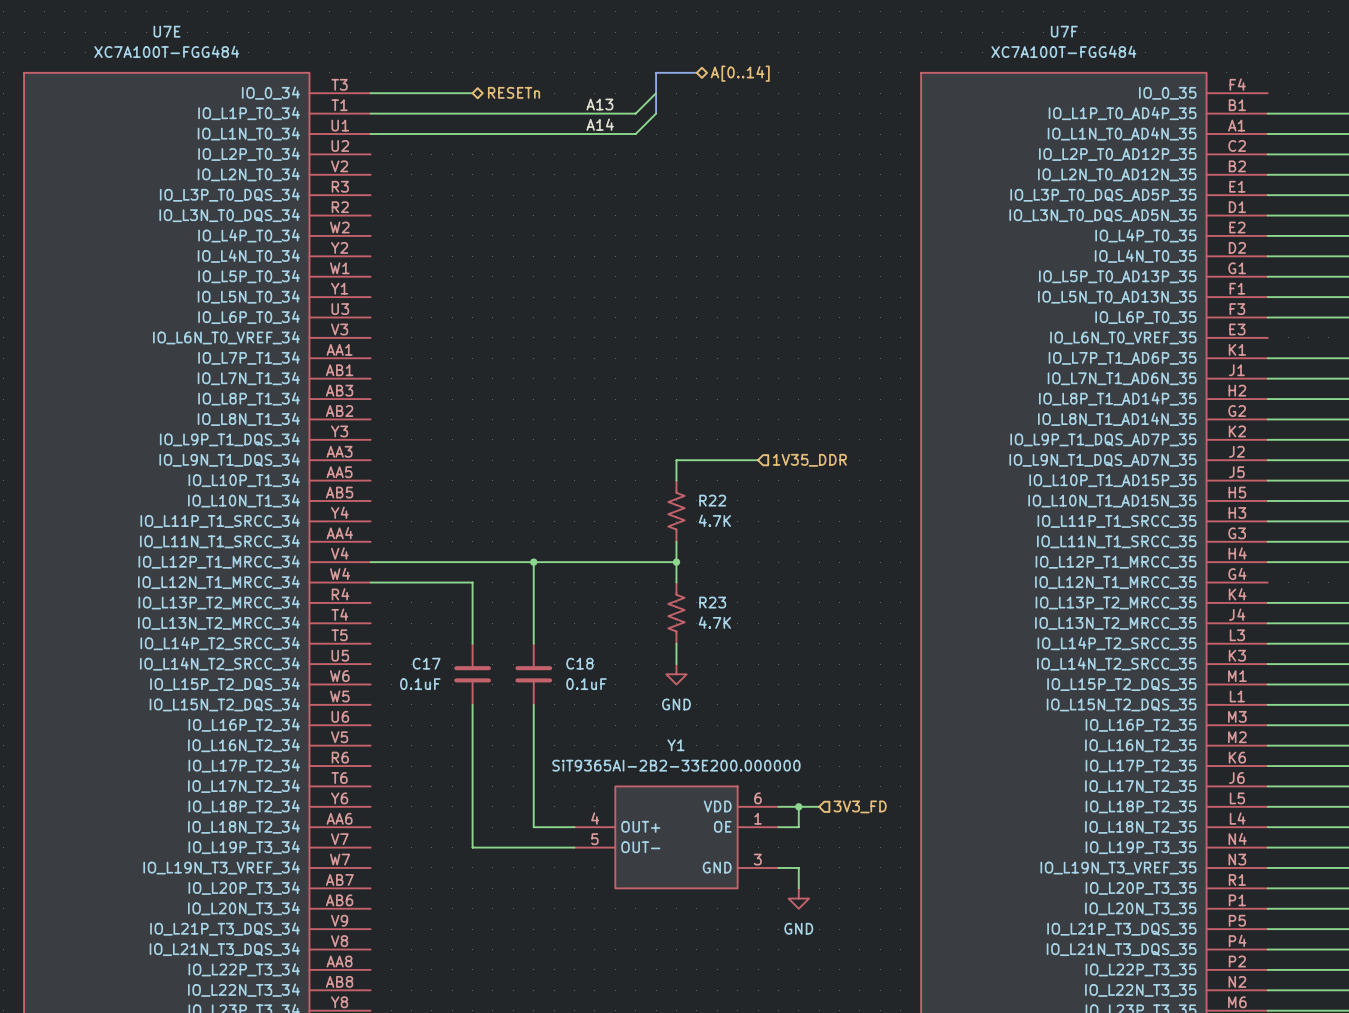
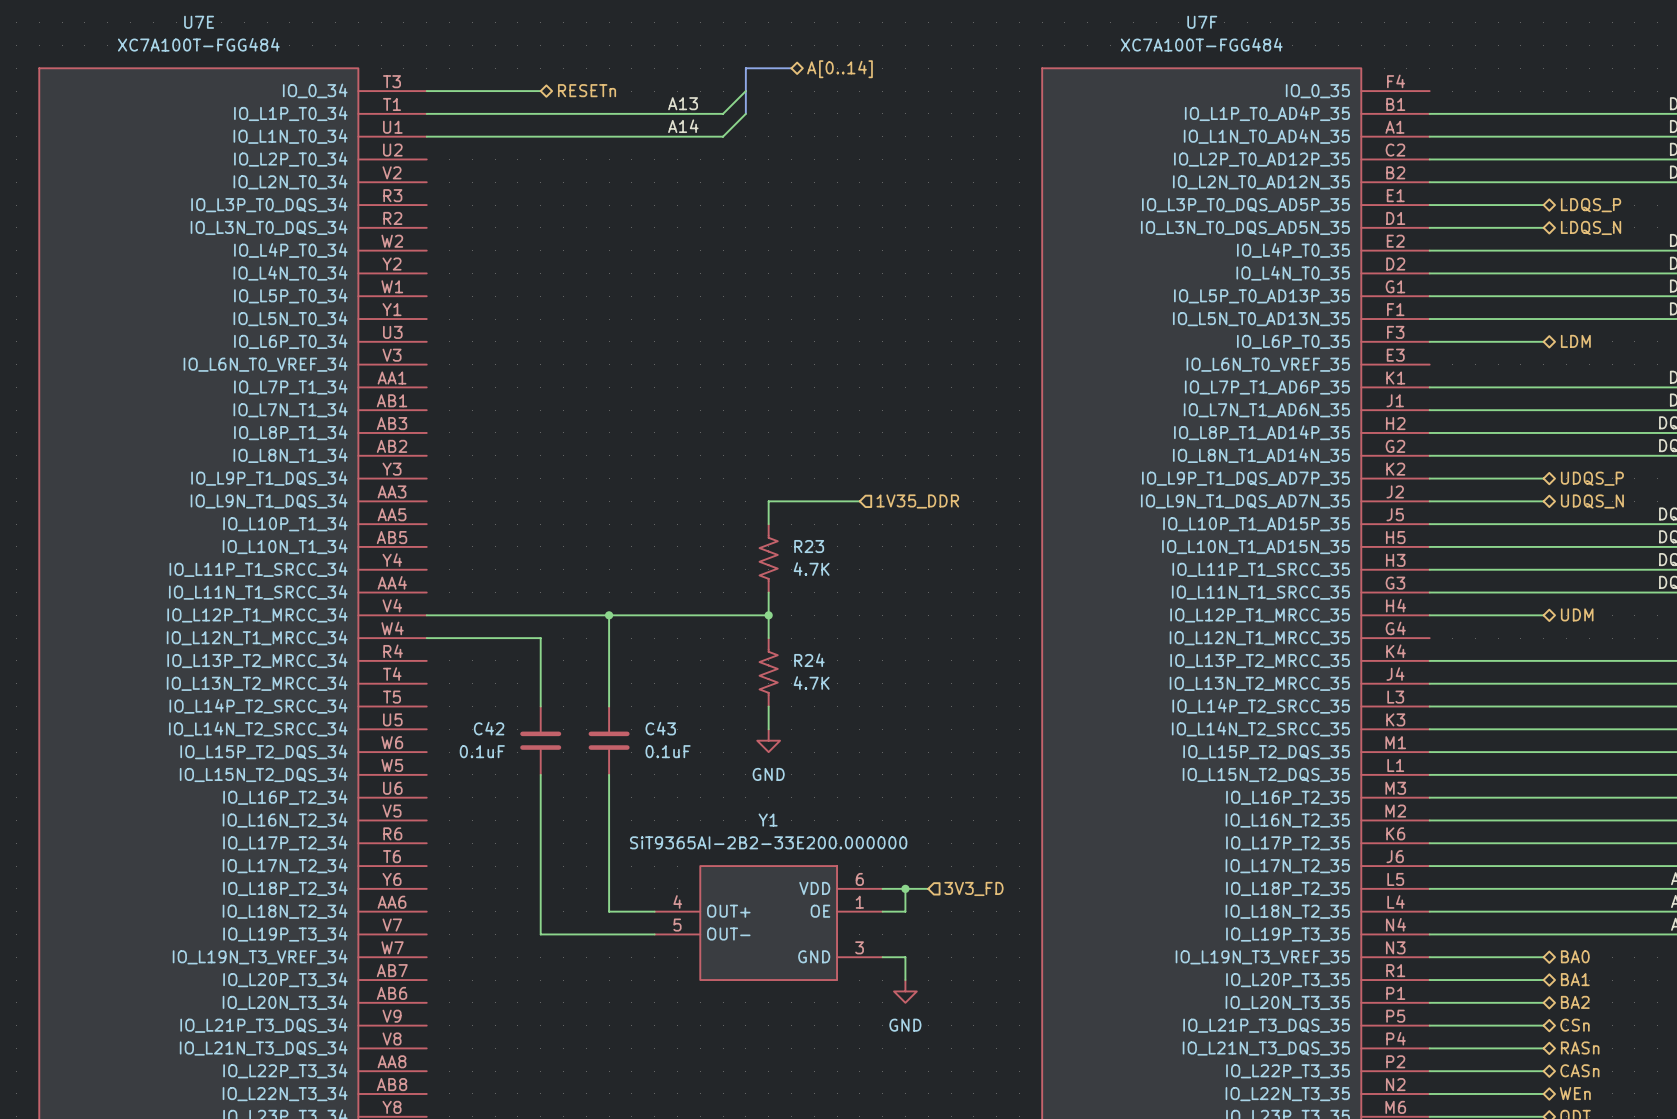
R22 name: R22 (712, 500) -> R23 (809, 546)
R23 name: R23 (712, 602) -> R24 (809, 660)
C17 name: C17 (426, 663) -> C42 (489, 728)
C18 name: C18 (579, 663) -> C43 (660, 728)

